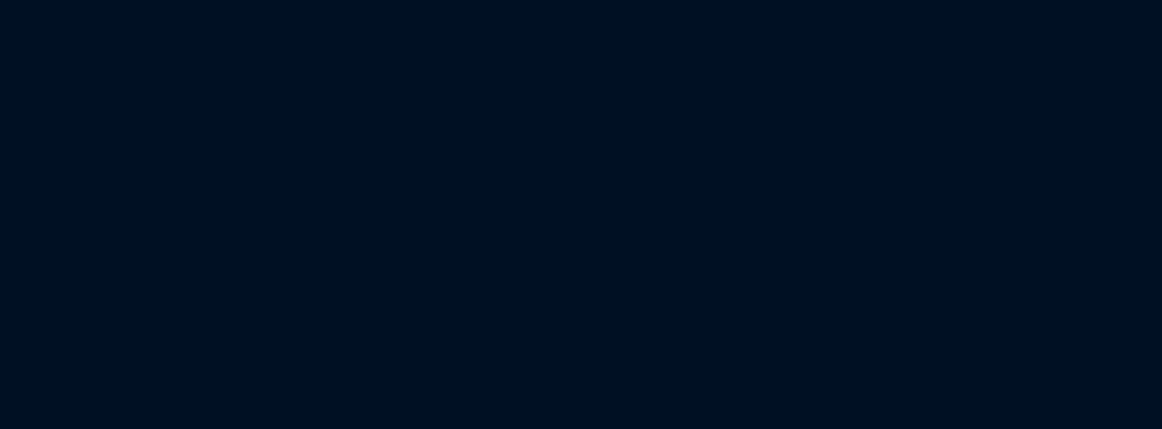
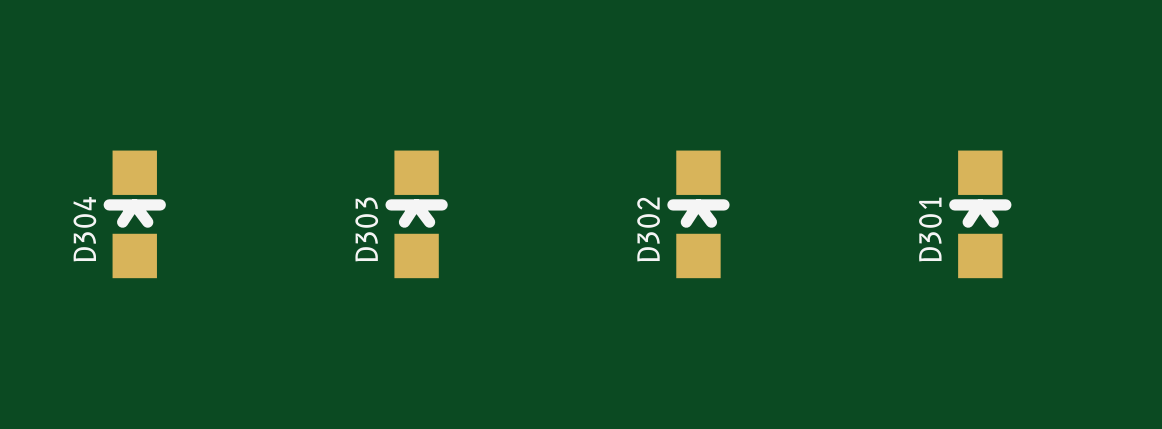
D304: none -> (134, 214)
D303: none -> (416, 214)
D302: none -> (698, 214)
D301: none -> (980, 214)

